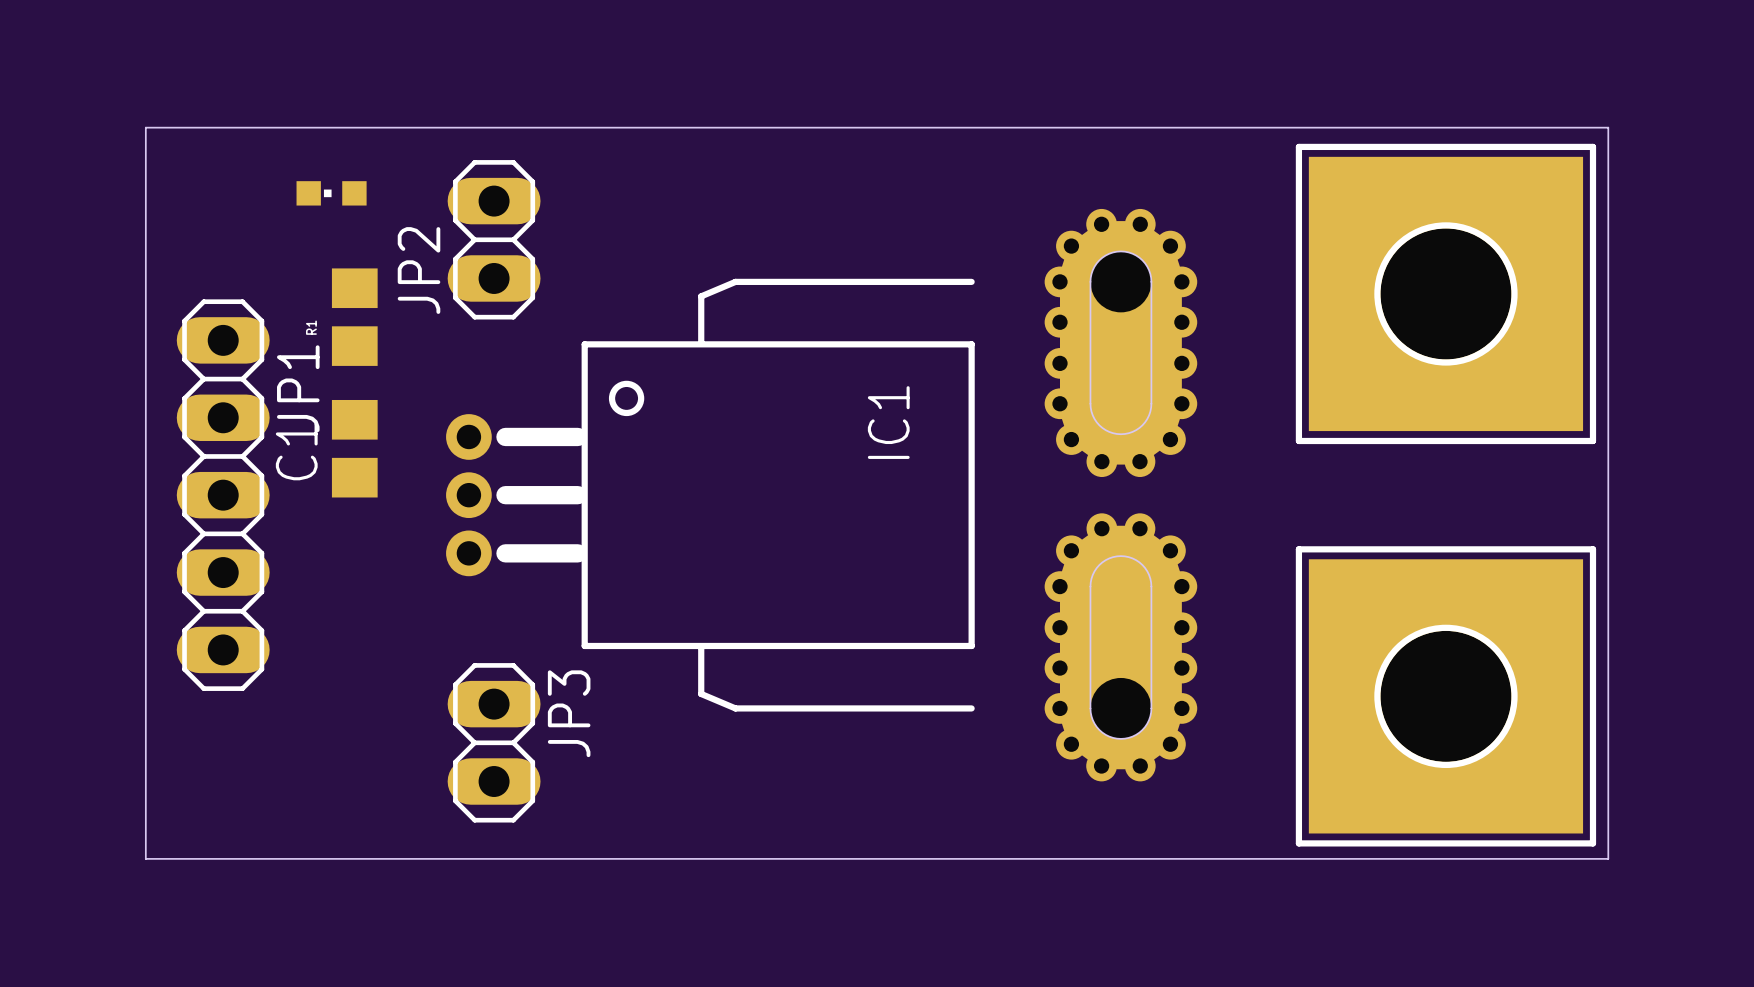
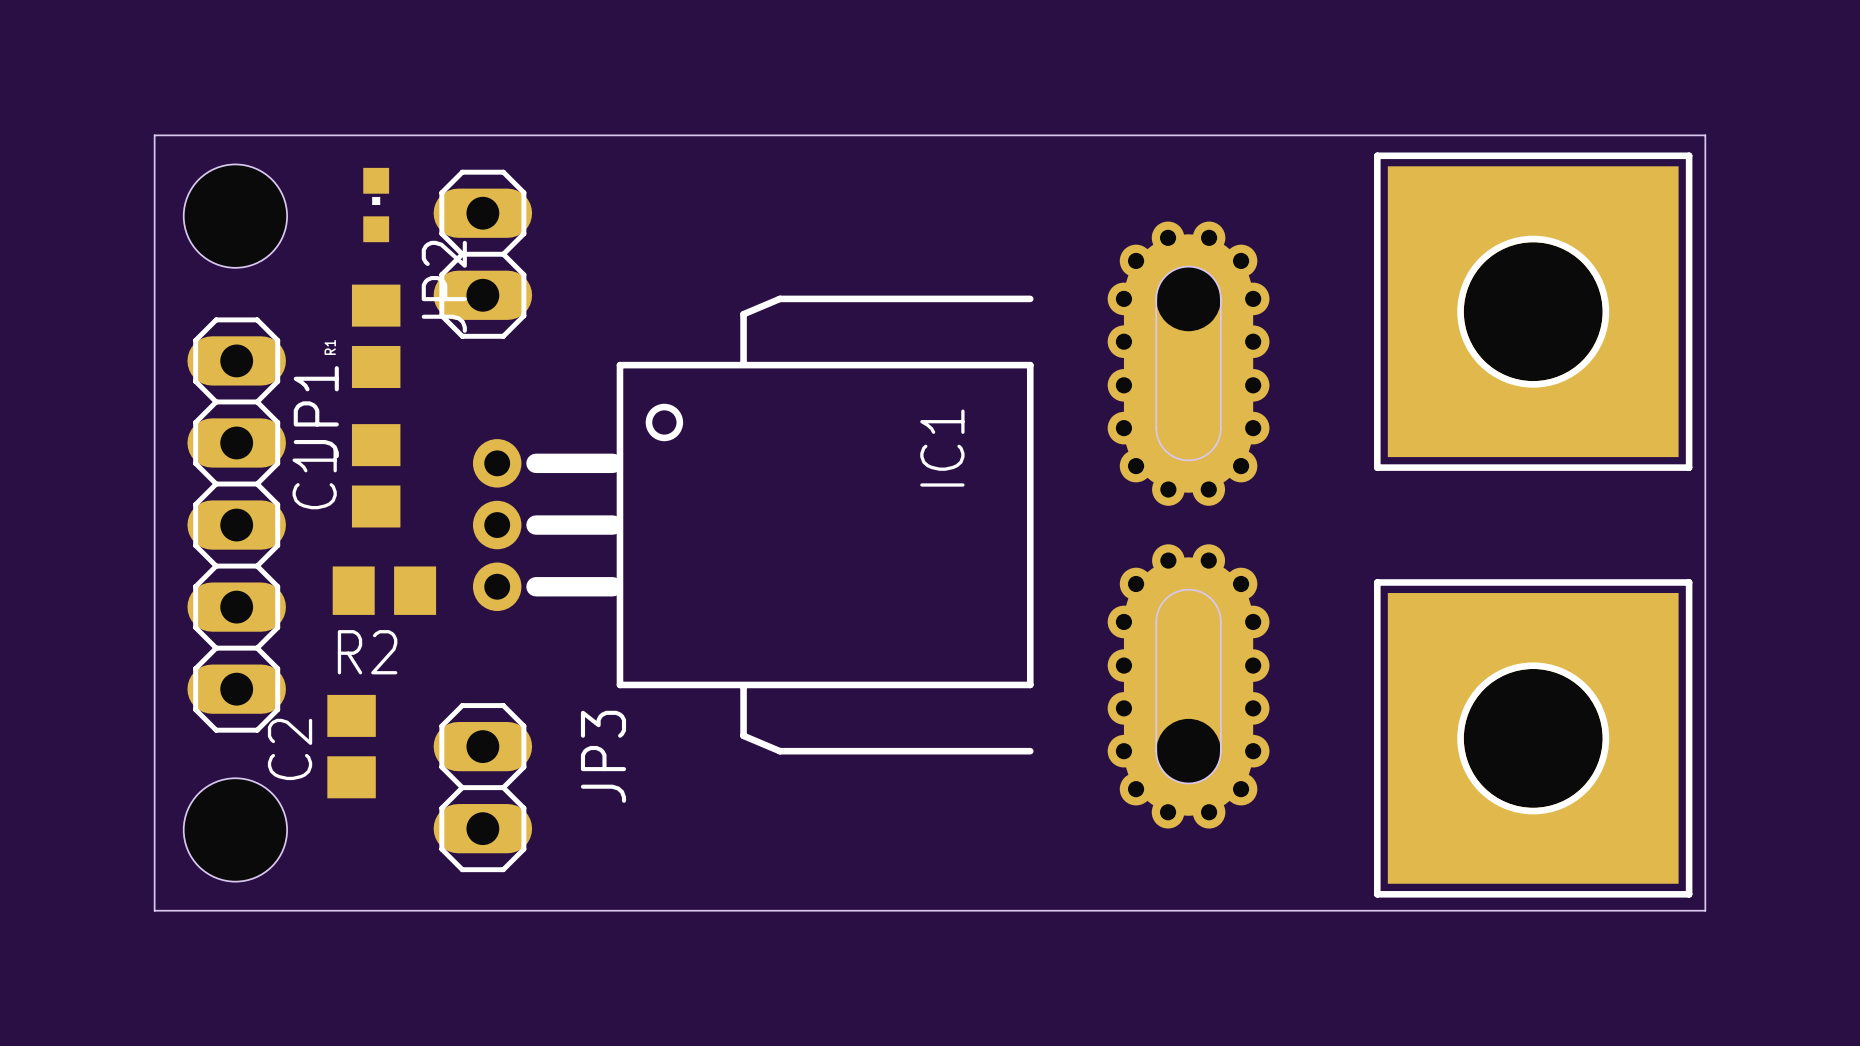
part rotation: 0° (331, 193) -> 90° clockwise (376, 205)
hole: none -> (235, 216)
JP2 position: (494, 239) -> (482, 254)
R2: none -> (384, 590)
C2: none -> (351, 746)
JP3 position: (494, 742) -> (482, 787)
hole: none -> (235, 829)

